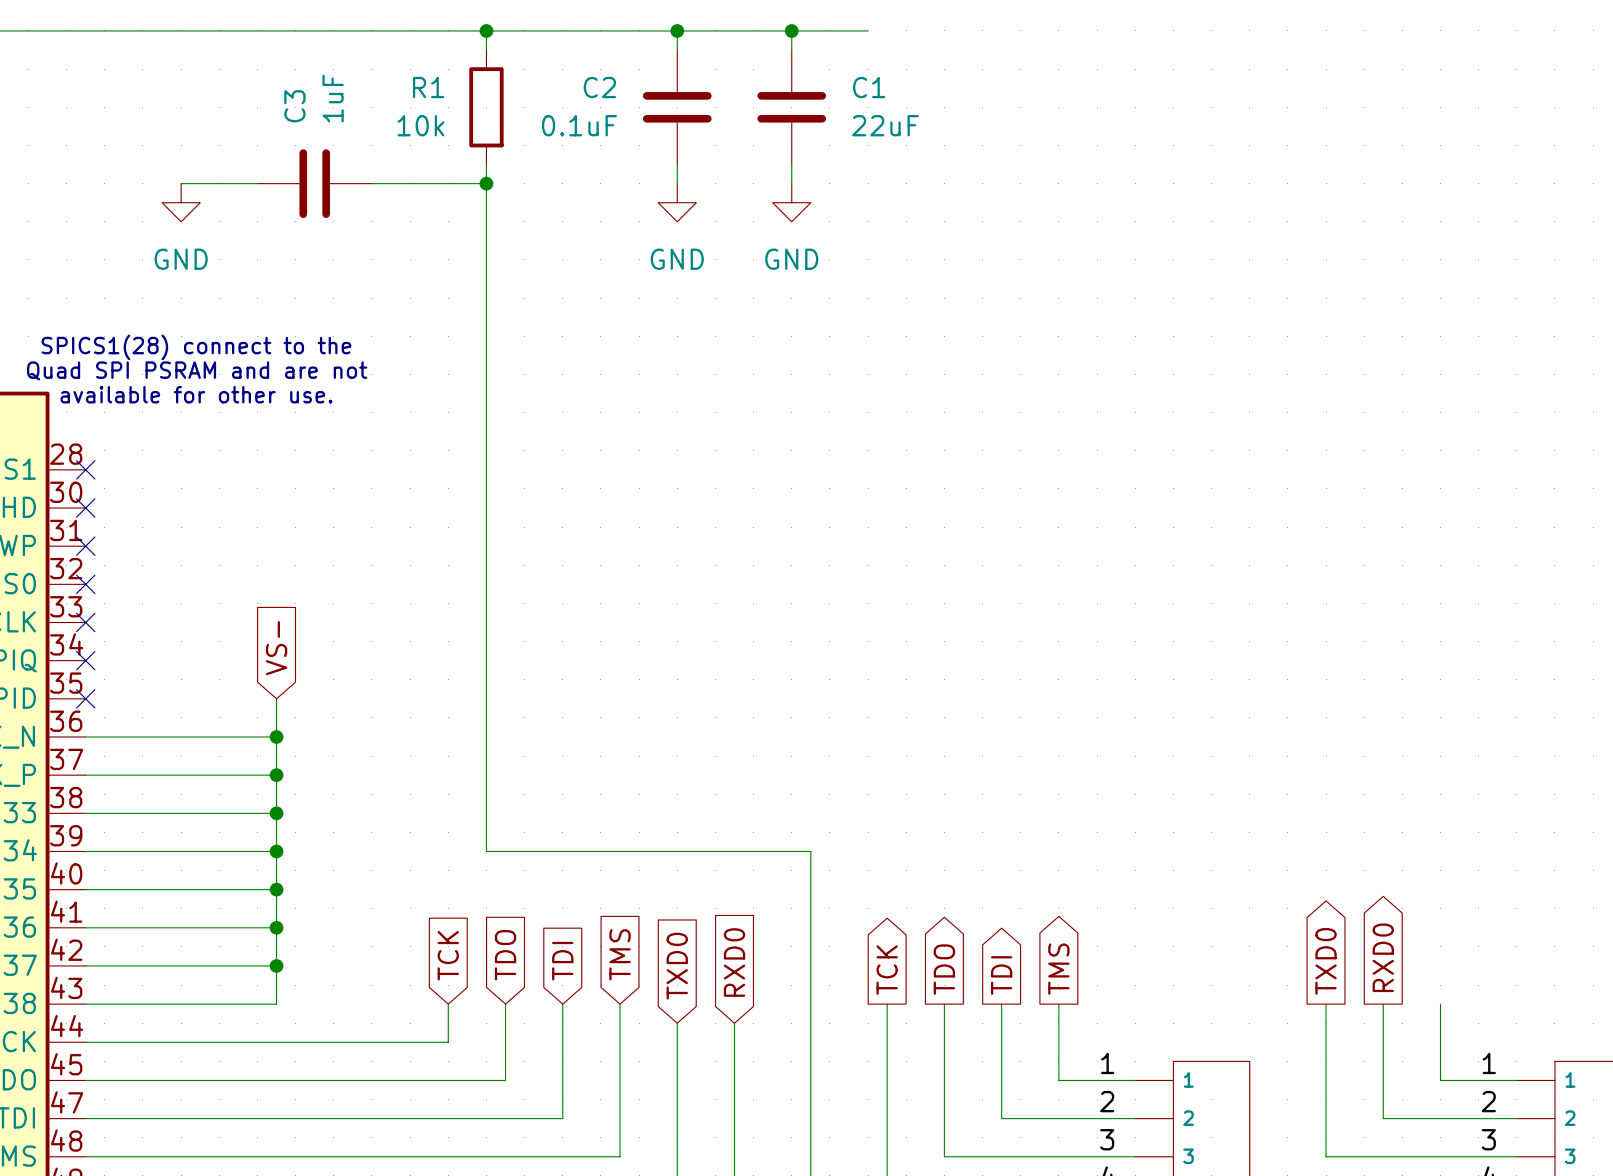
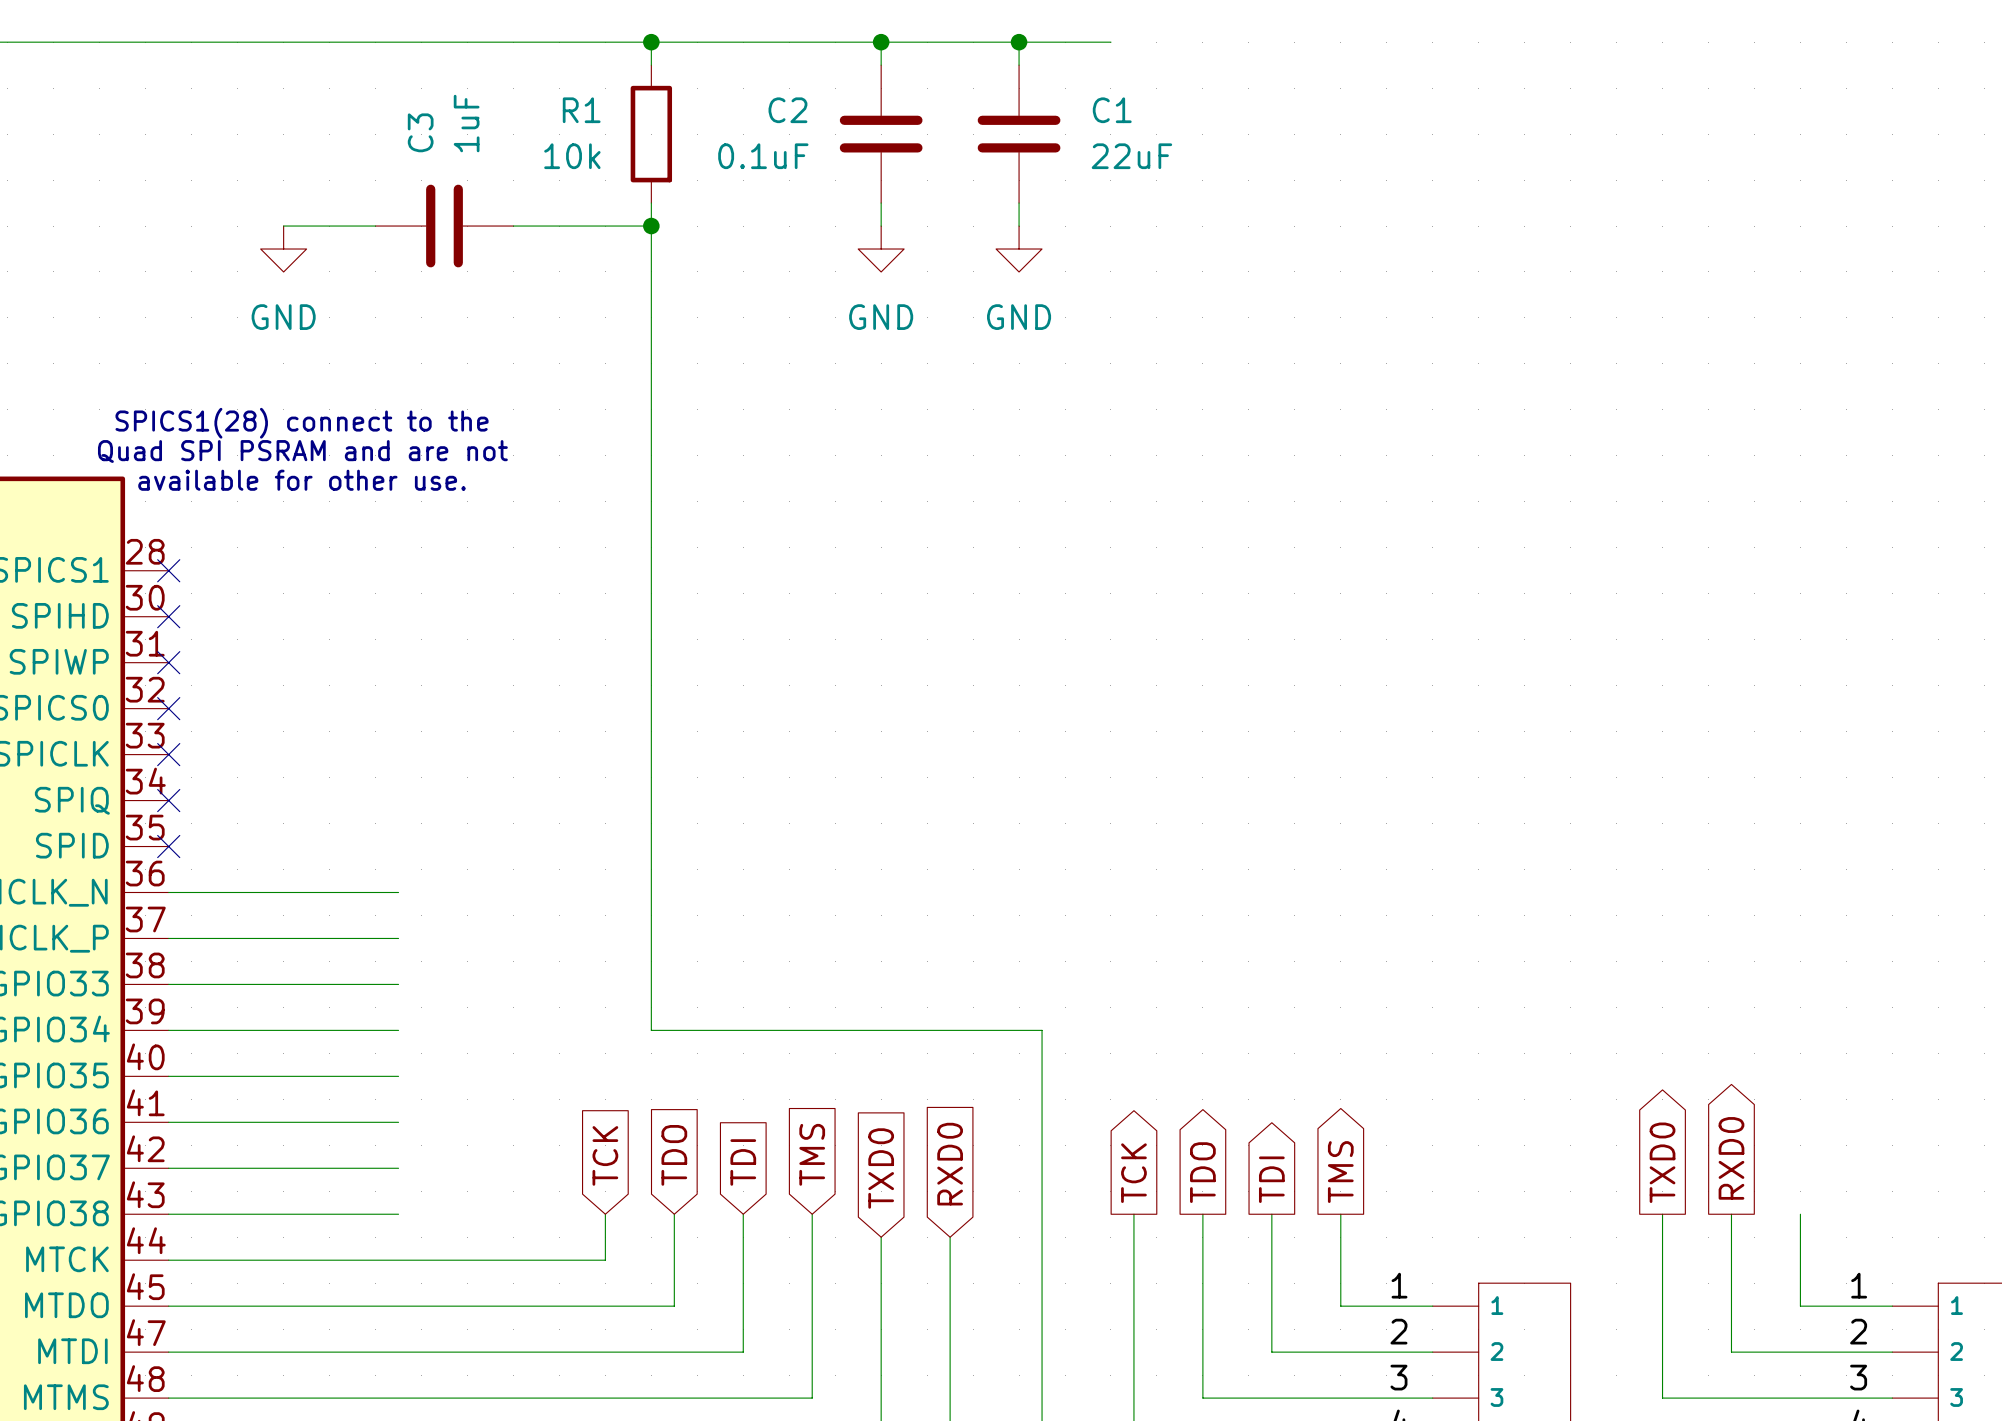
global label: VS- (276, 648) -> none
wire: (276, 698) (276, 1004) -> none
junction: (276, 737) -> none
junction: (276, 775) -> none
junction: (276, 813) -> none
junction: (276, 851) -> none
junction: (276, 889) -> none
junction: (276, 927) -> none
junction: (276, 965) -> none

